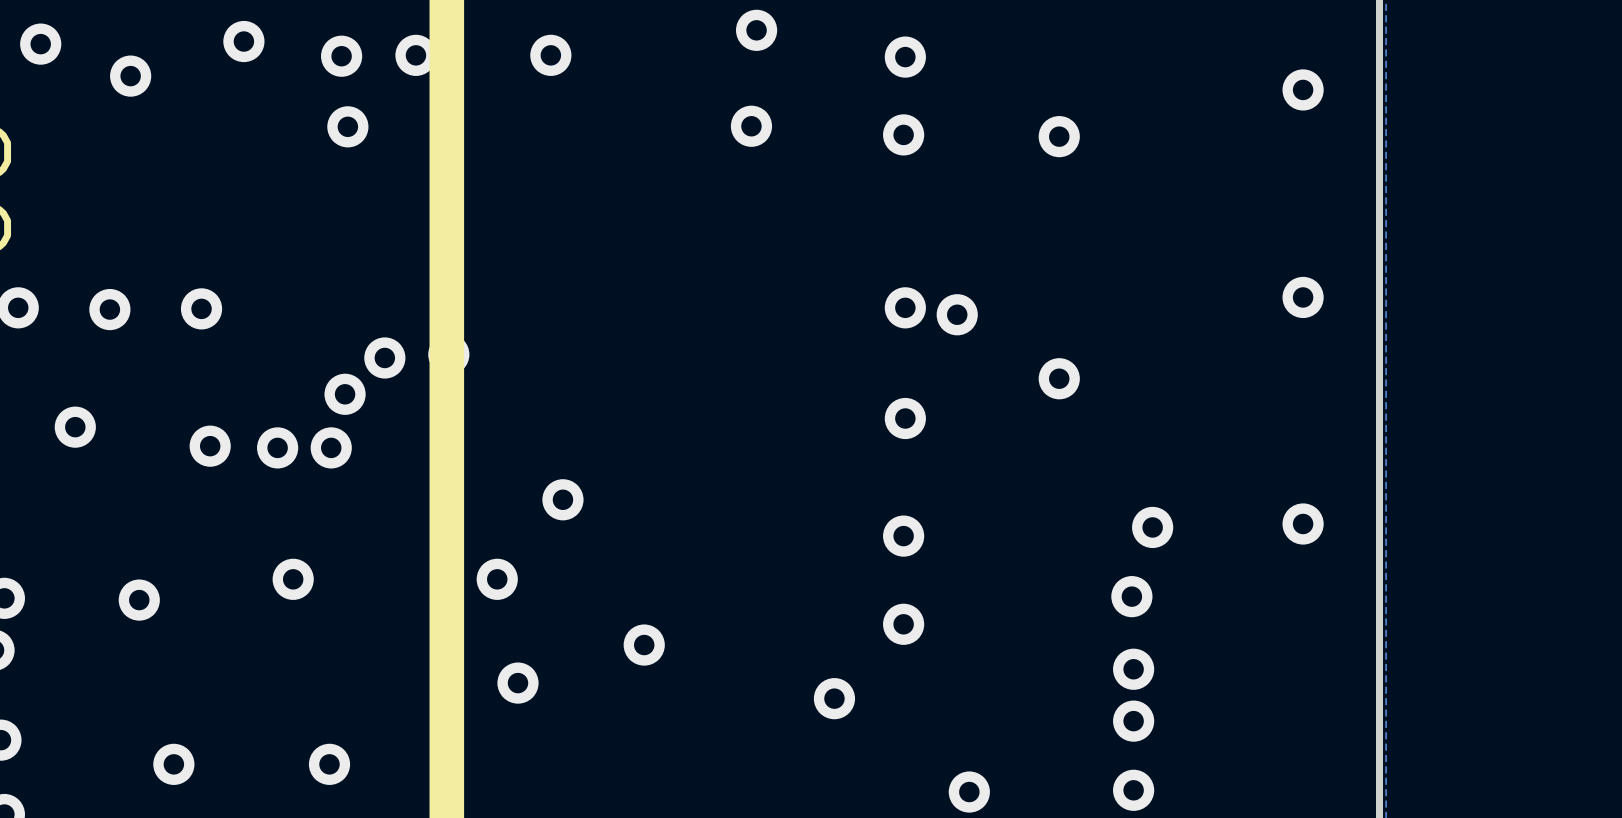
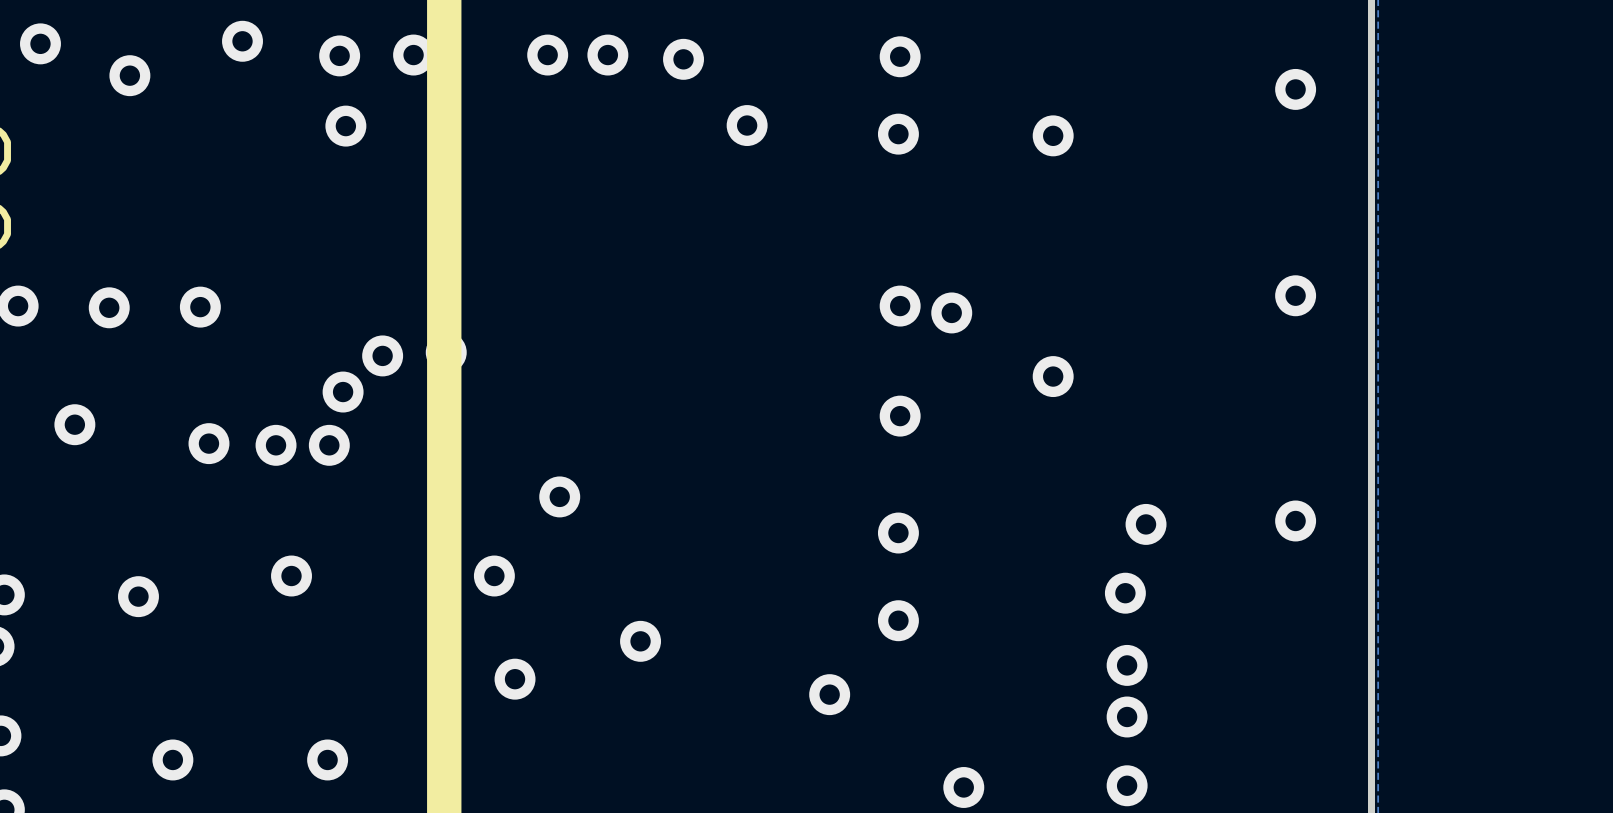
via: (756, 30) -> none
via: none -> (607, 55)
via: none -> (683, 59)

